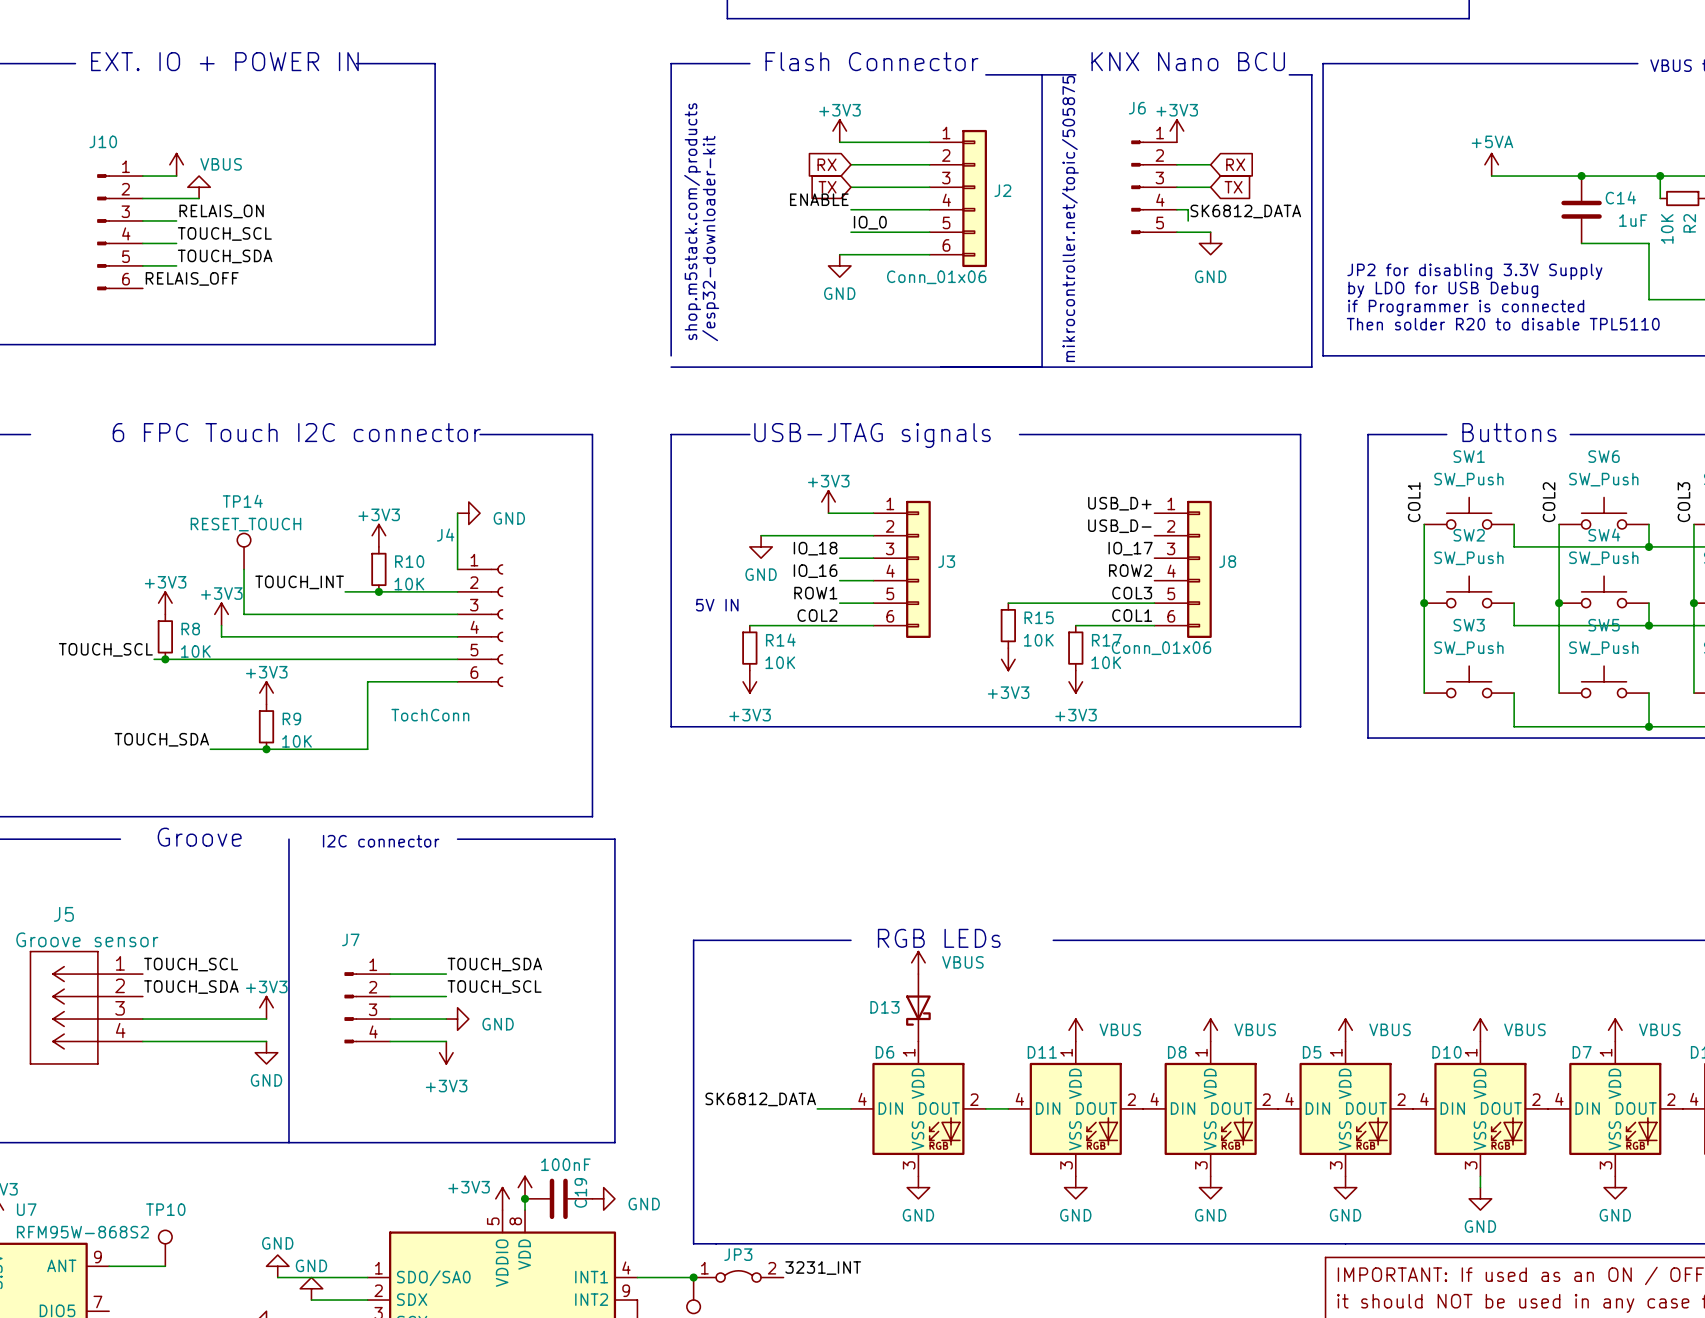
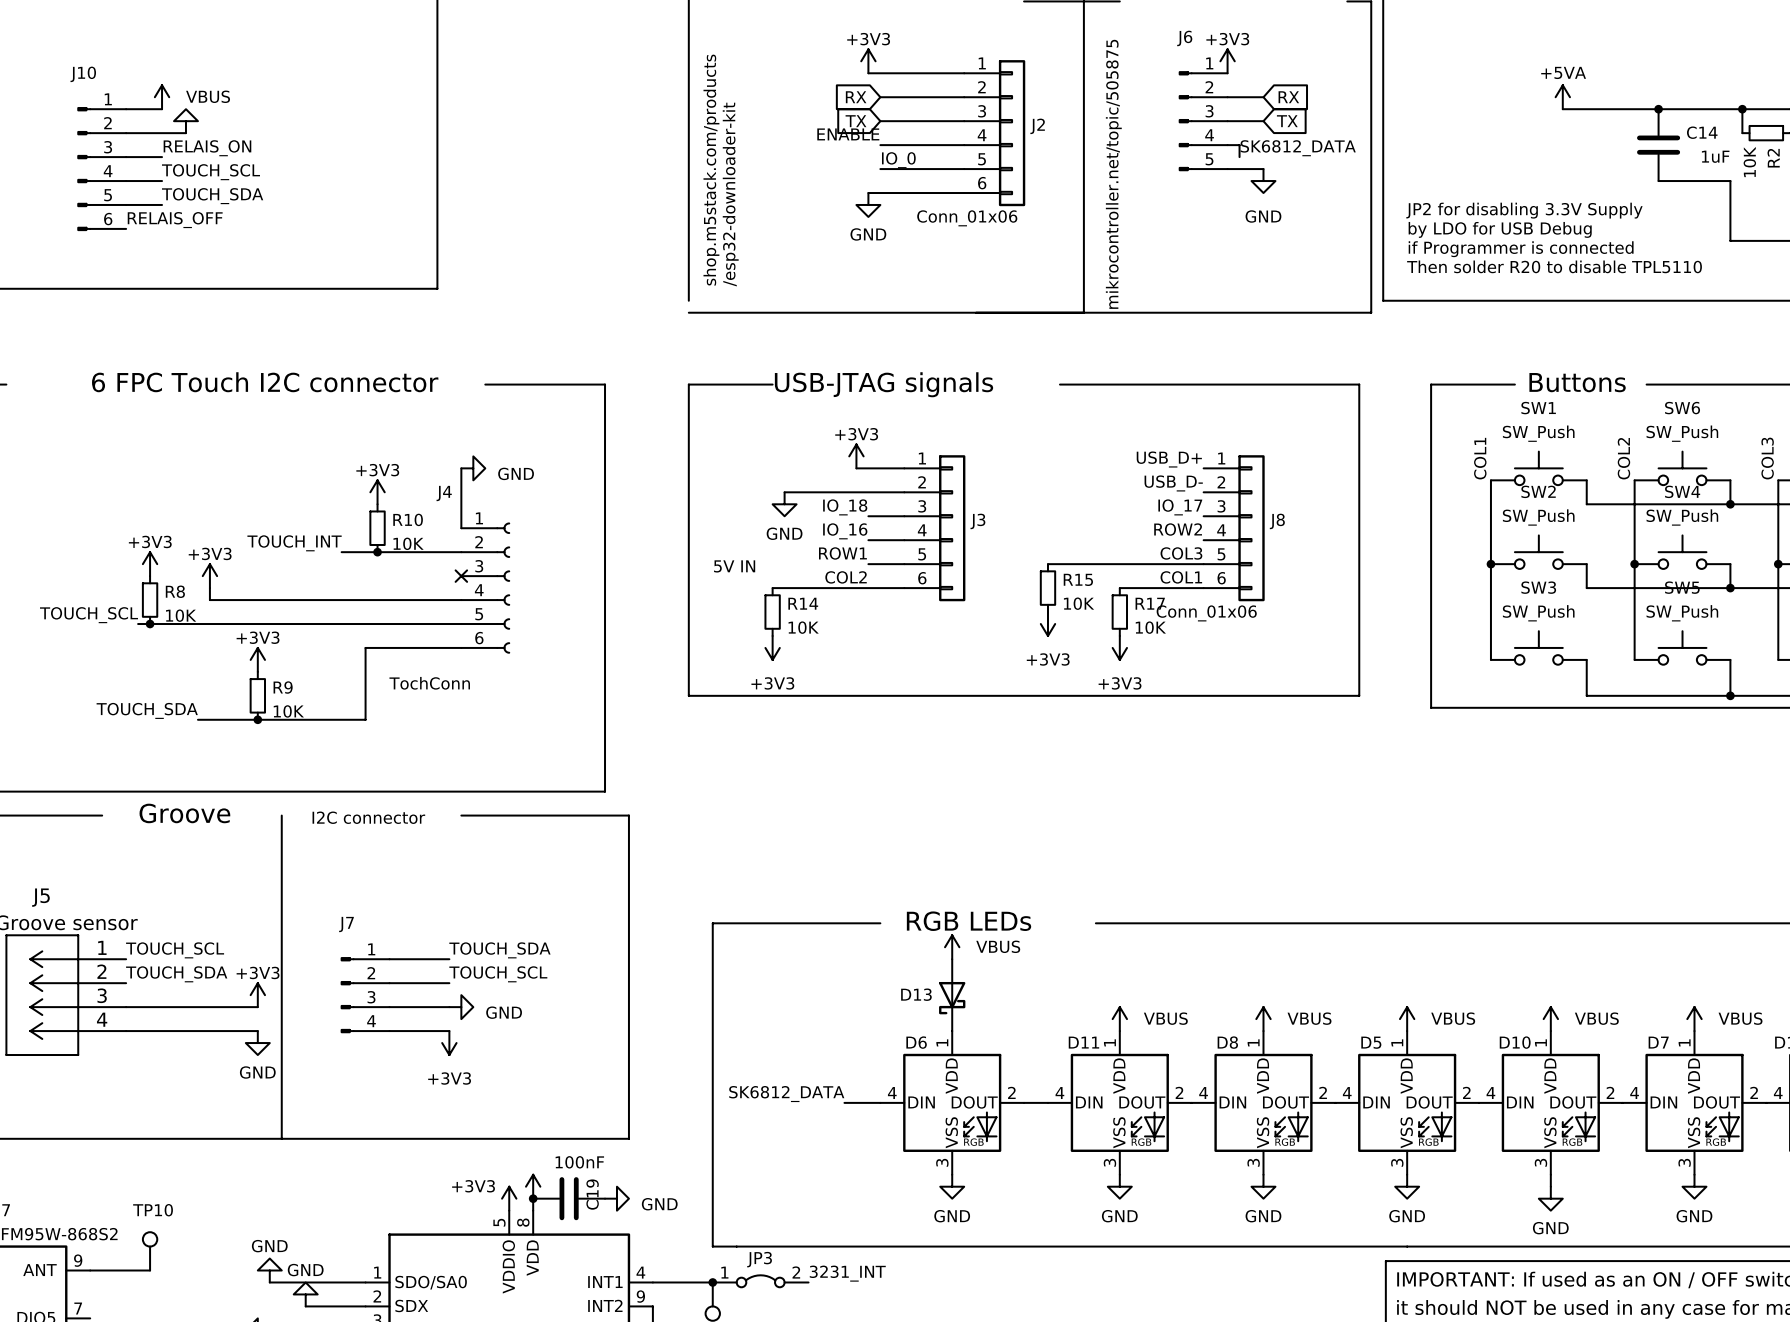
TP14: RESET_TOUCH (244, 551) -> none
wire: (244, 569) (244, 614) (457, 614) -> none
no-connect mark: none -> (461, 576)

